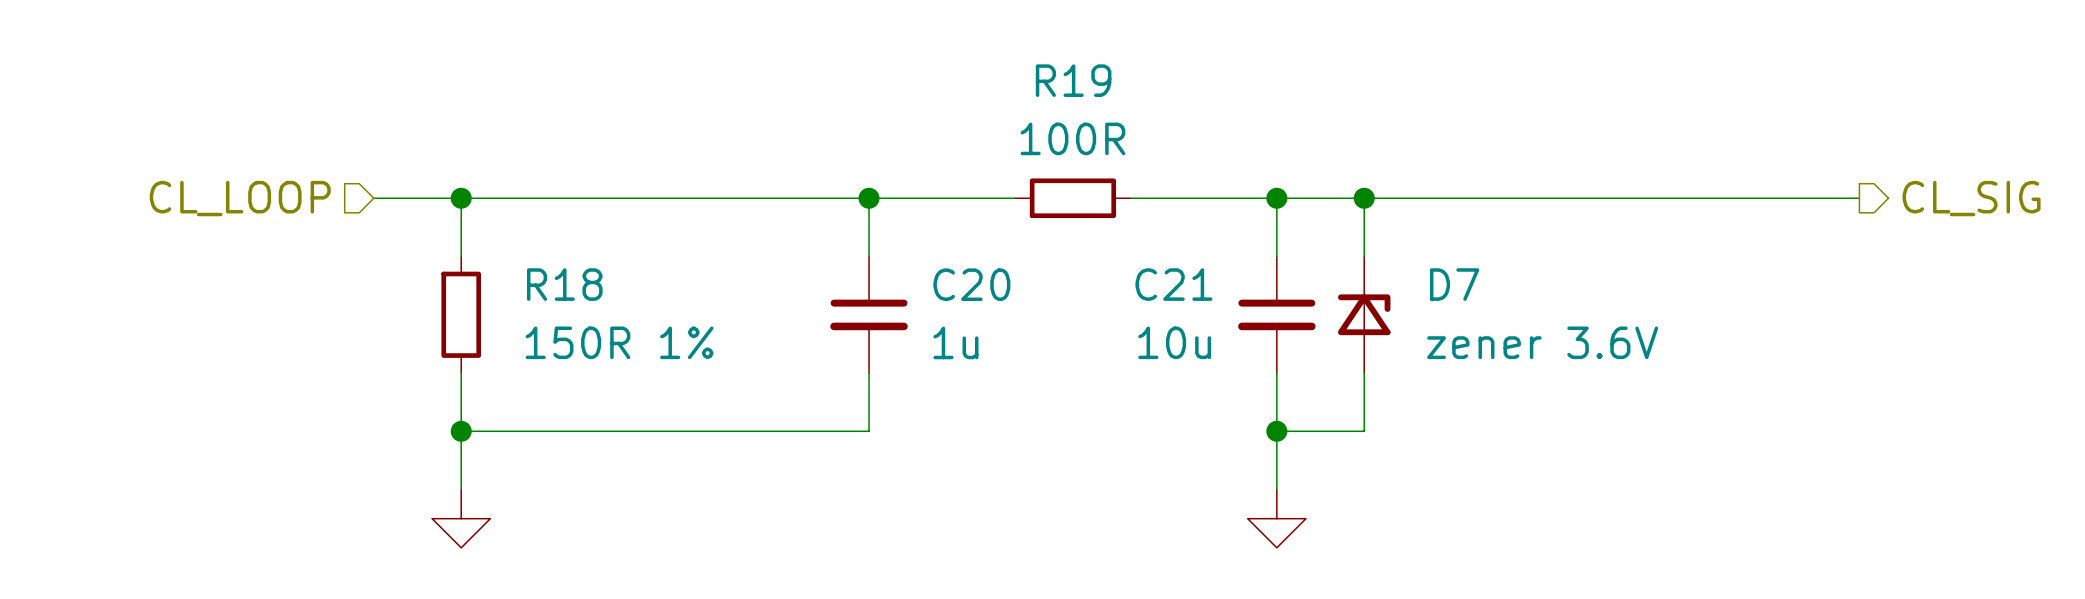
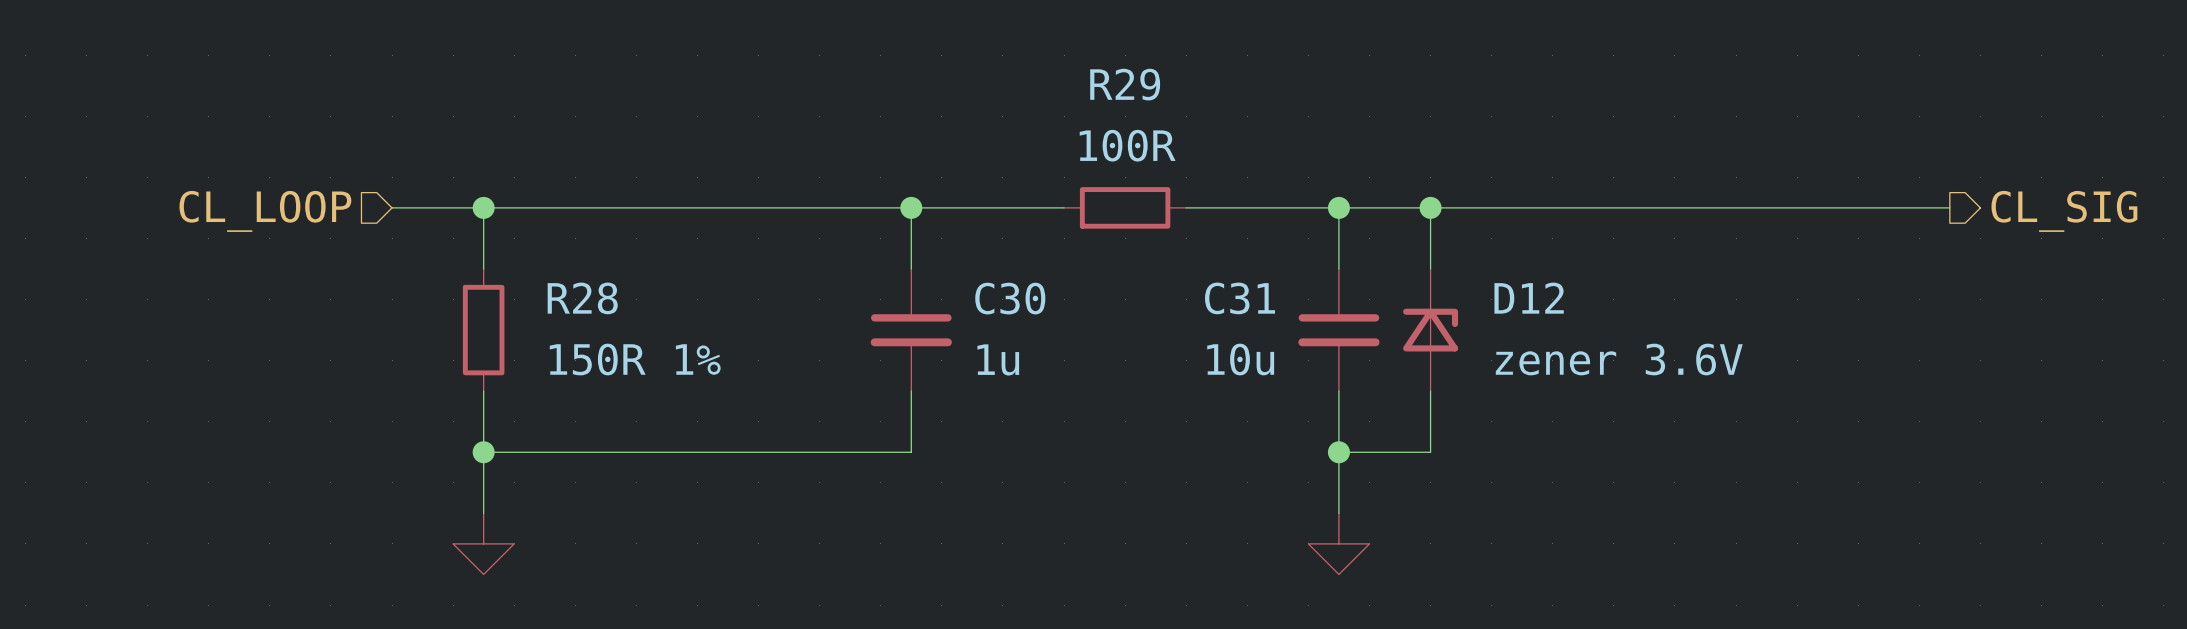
R19 name: R19 (1073, 80) -> R29 (1125, 84)
R18 name: R18 (564, 284) -> R28 (582, 298)
C20 name: C20 (971, 284) -> C30 (1010, 298)
C21 name: C21 (1173, 284) -> C31 (1240, 298)
D7 name: D7 (1454, 284) -> D12 (1529, 298)

